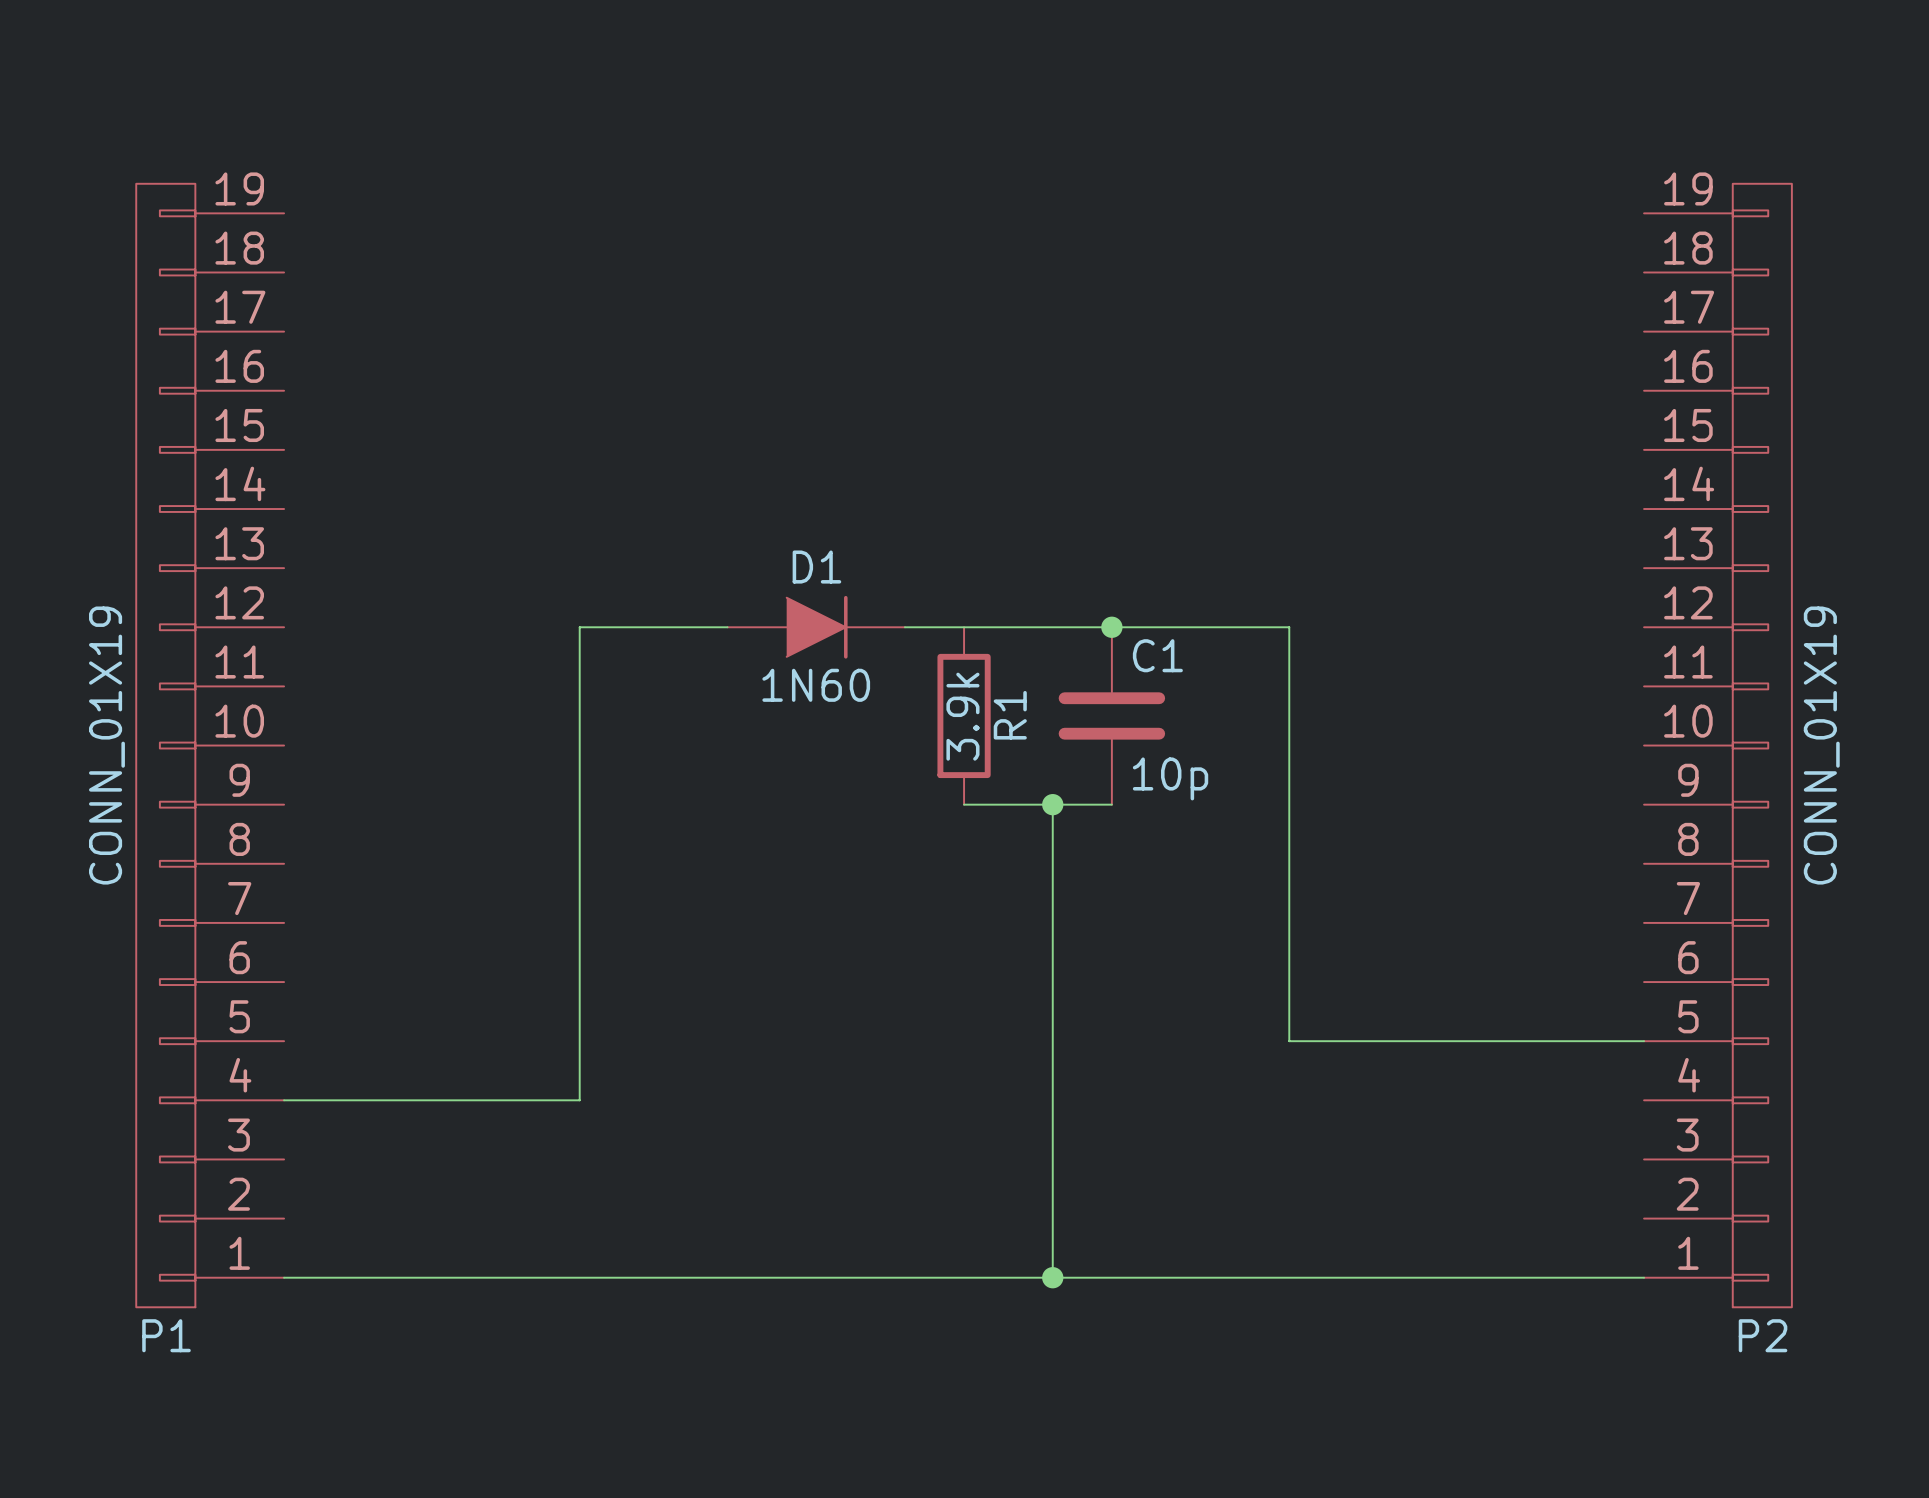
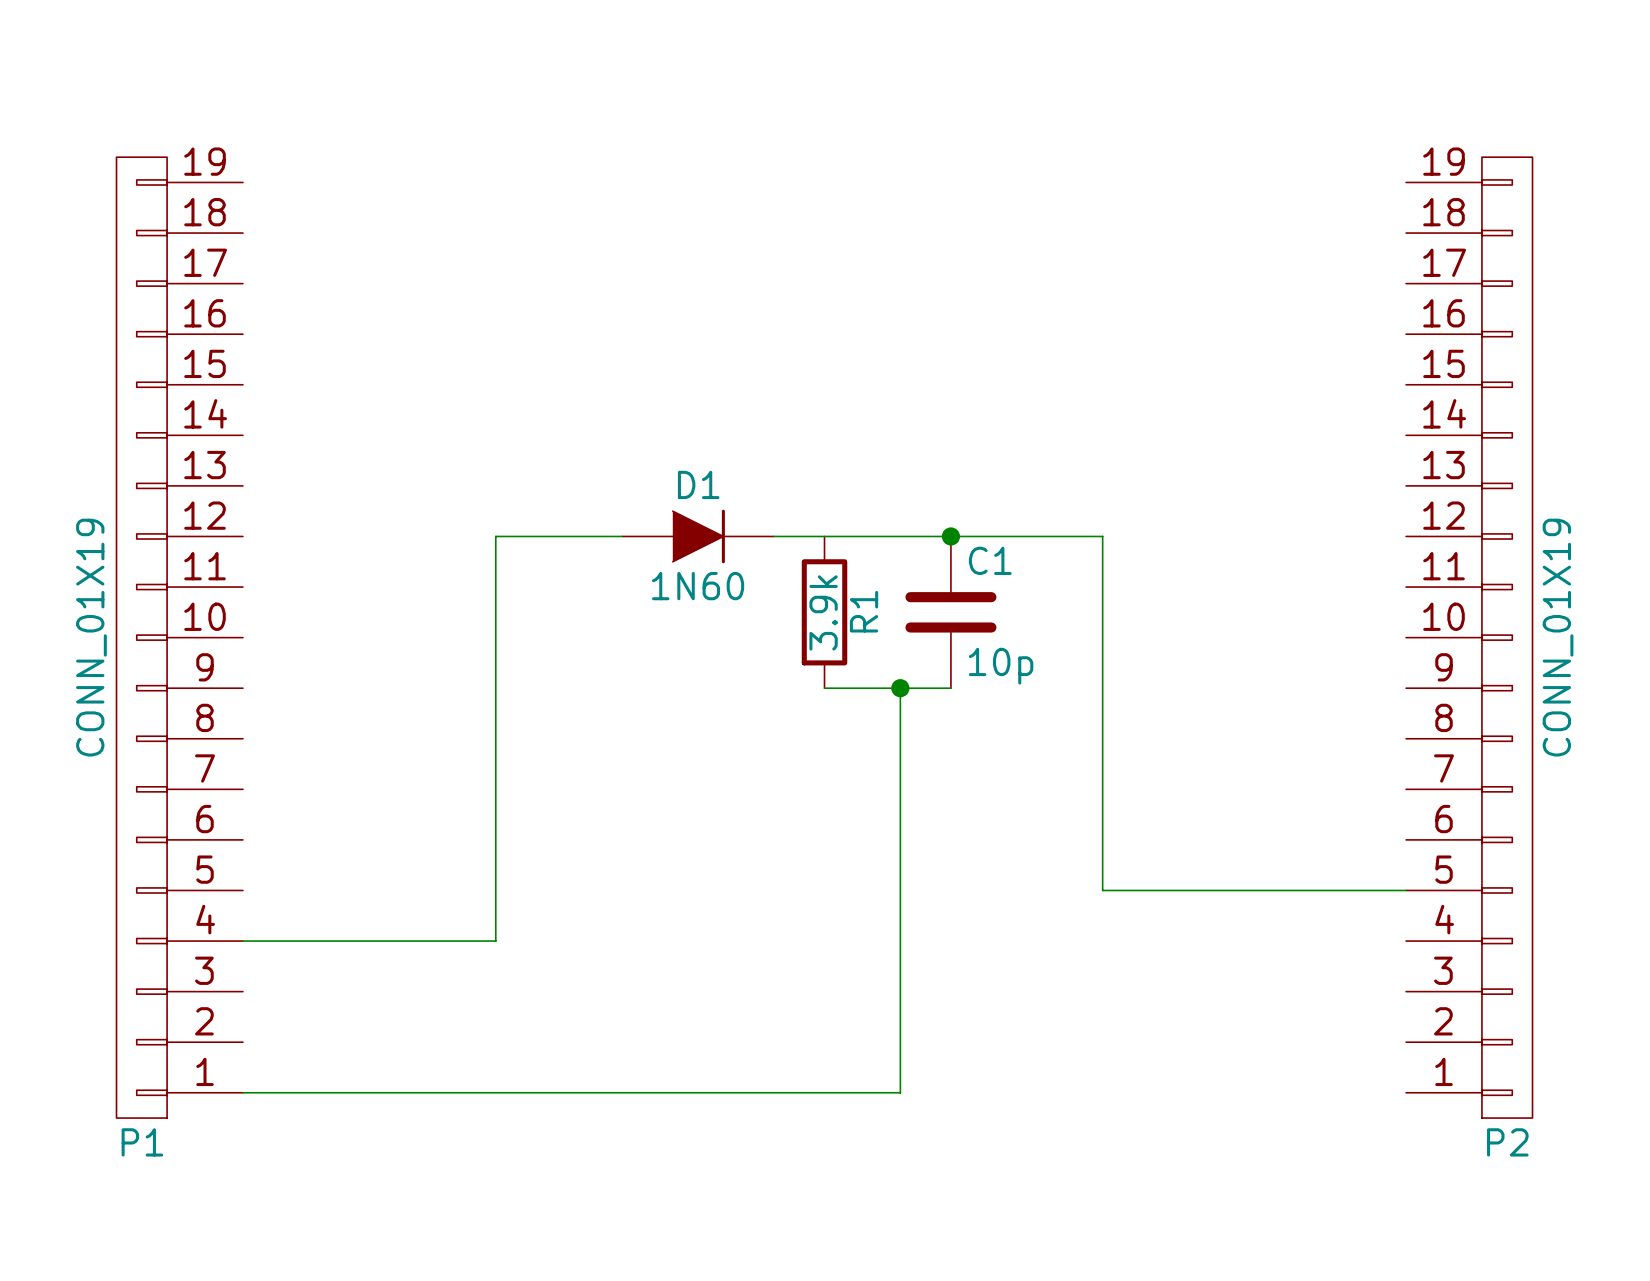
wire: (1052, 1277) (1644, 1277) -> none
junction: (1052, 1277) -> none

